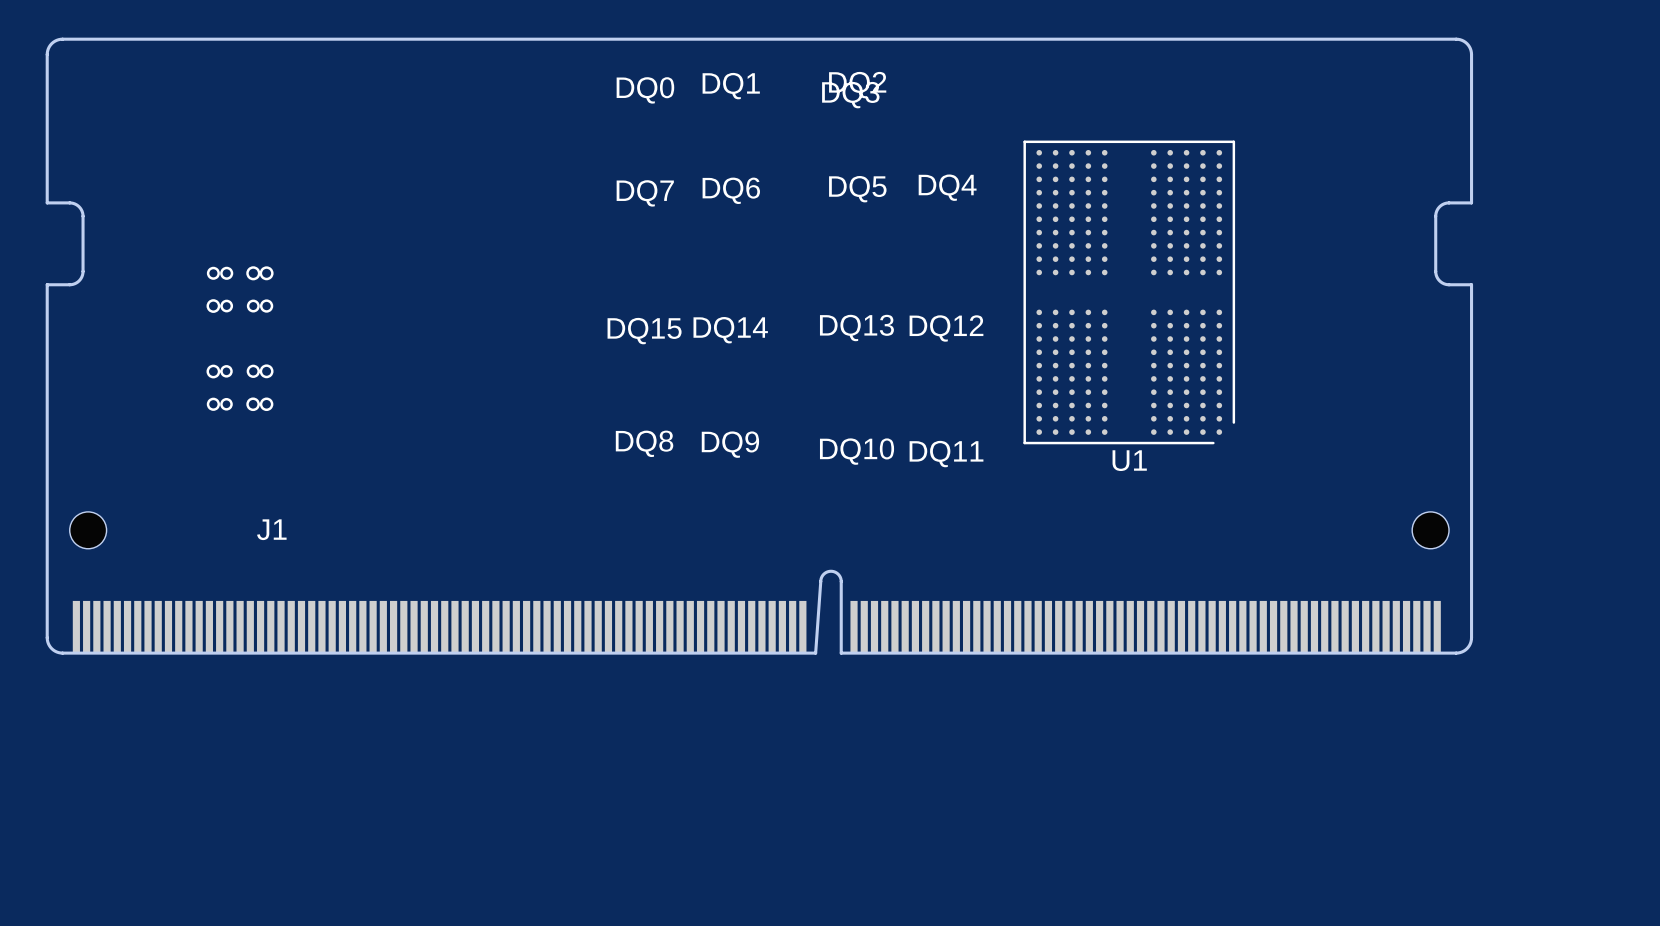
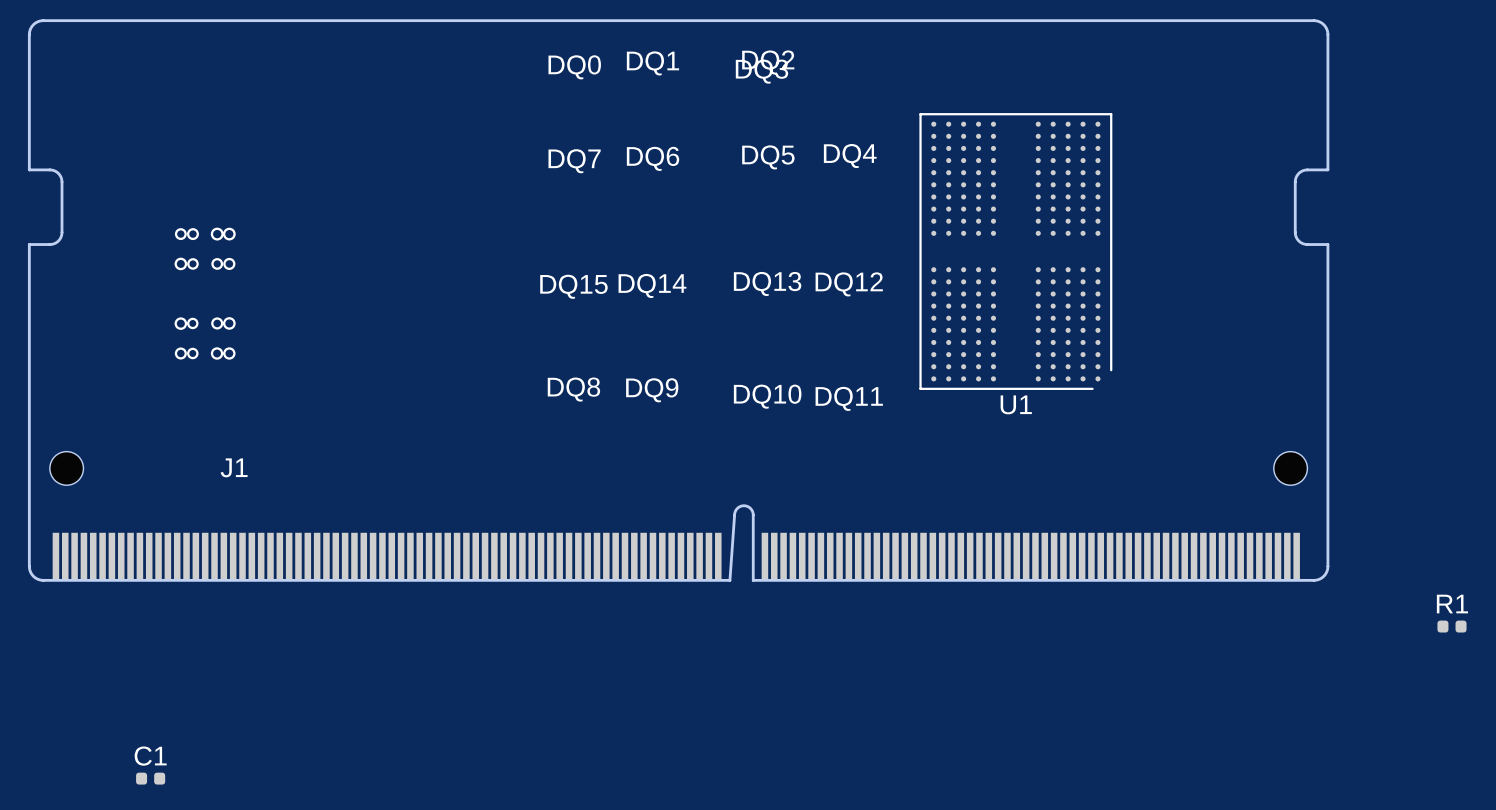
R1: none -> (1451, 626)
C1: none -> (150, 778)

